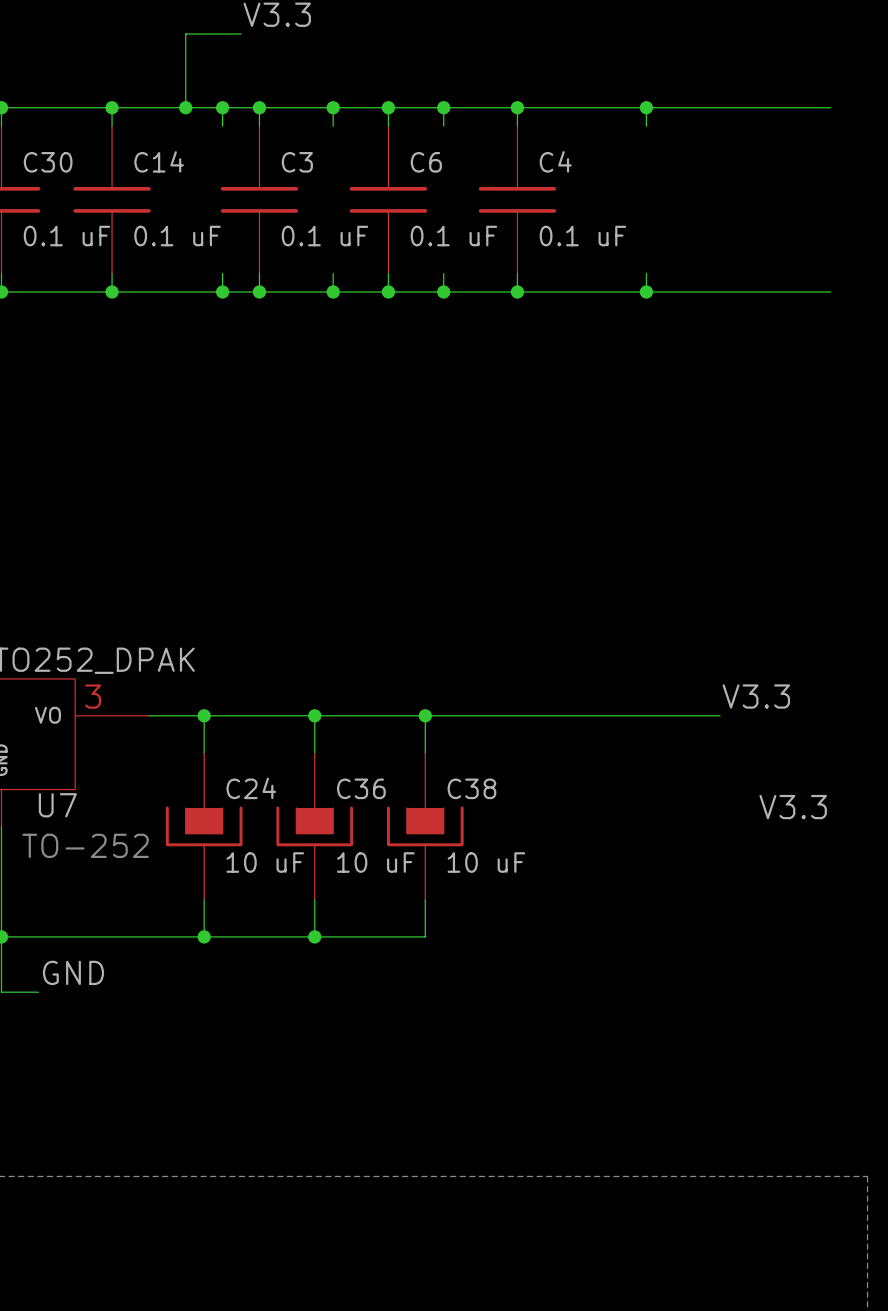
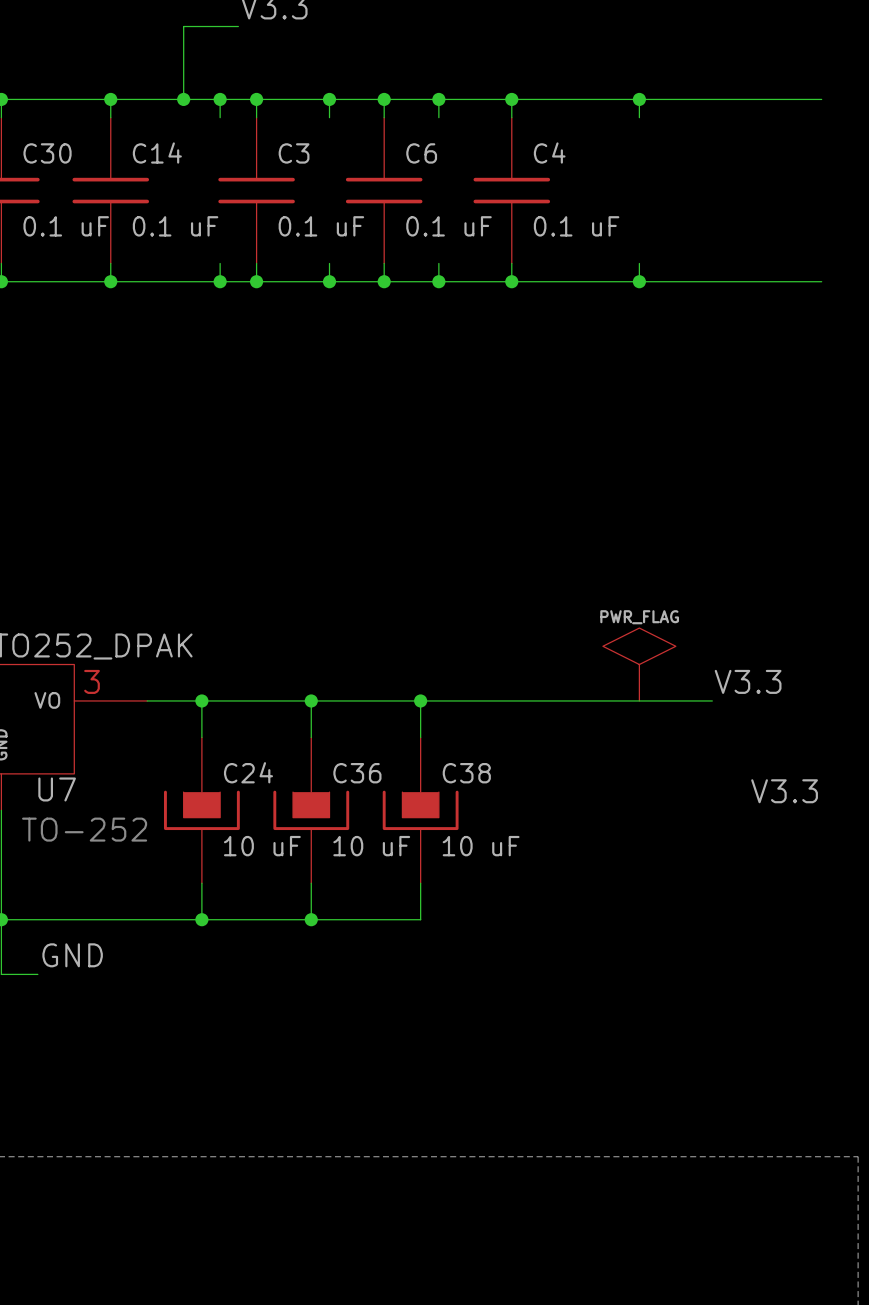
power symbol: none -> PWR_FLAG (639, 664)

